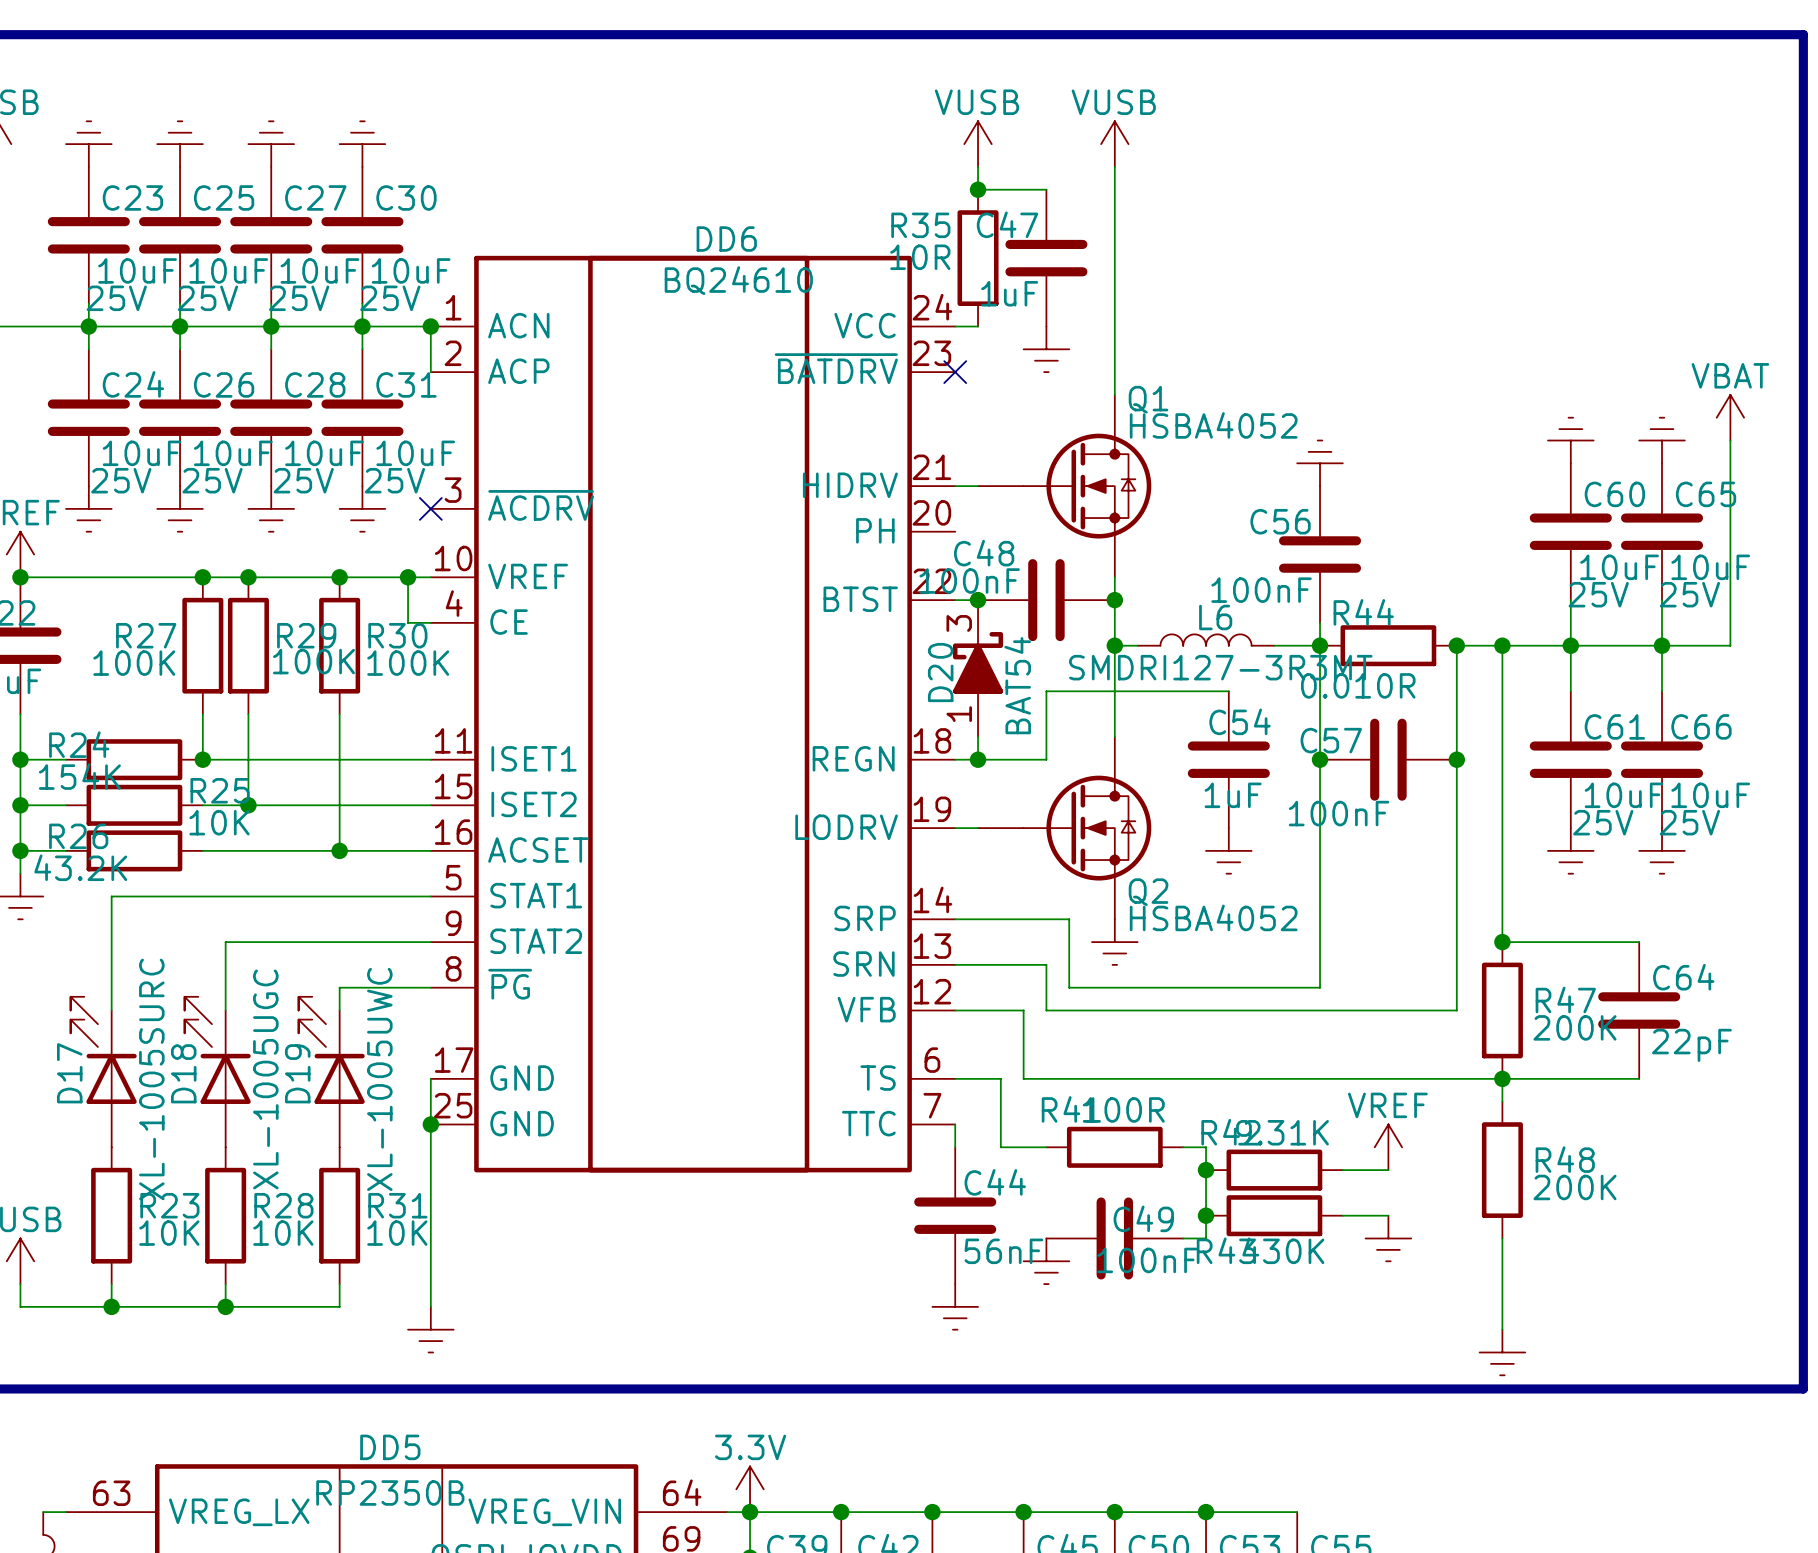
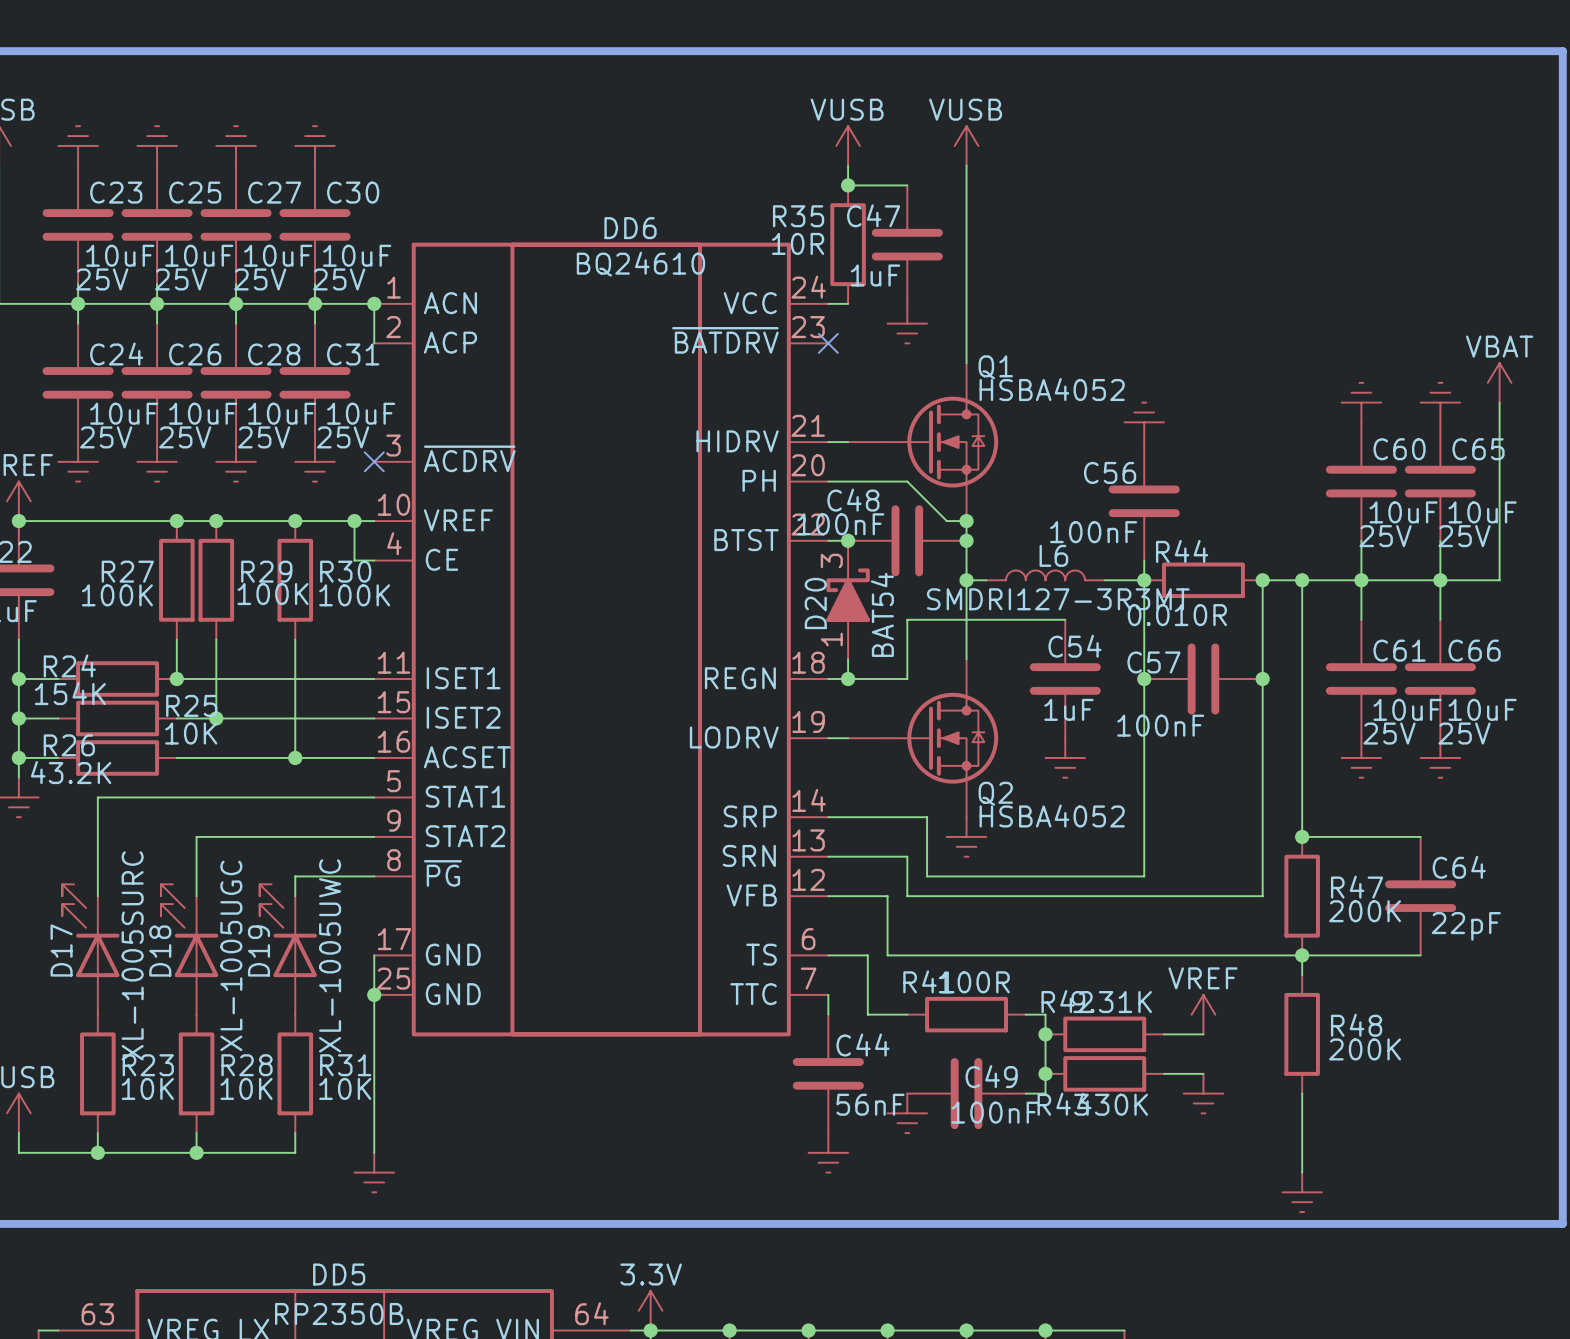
wire: none -> (828, 481) (907, 481) (946, 521) (966, 521)
junction: none -> (966, 521)

